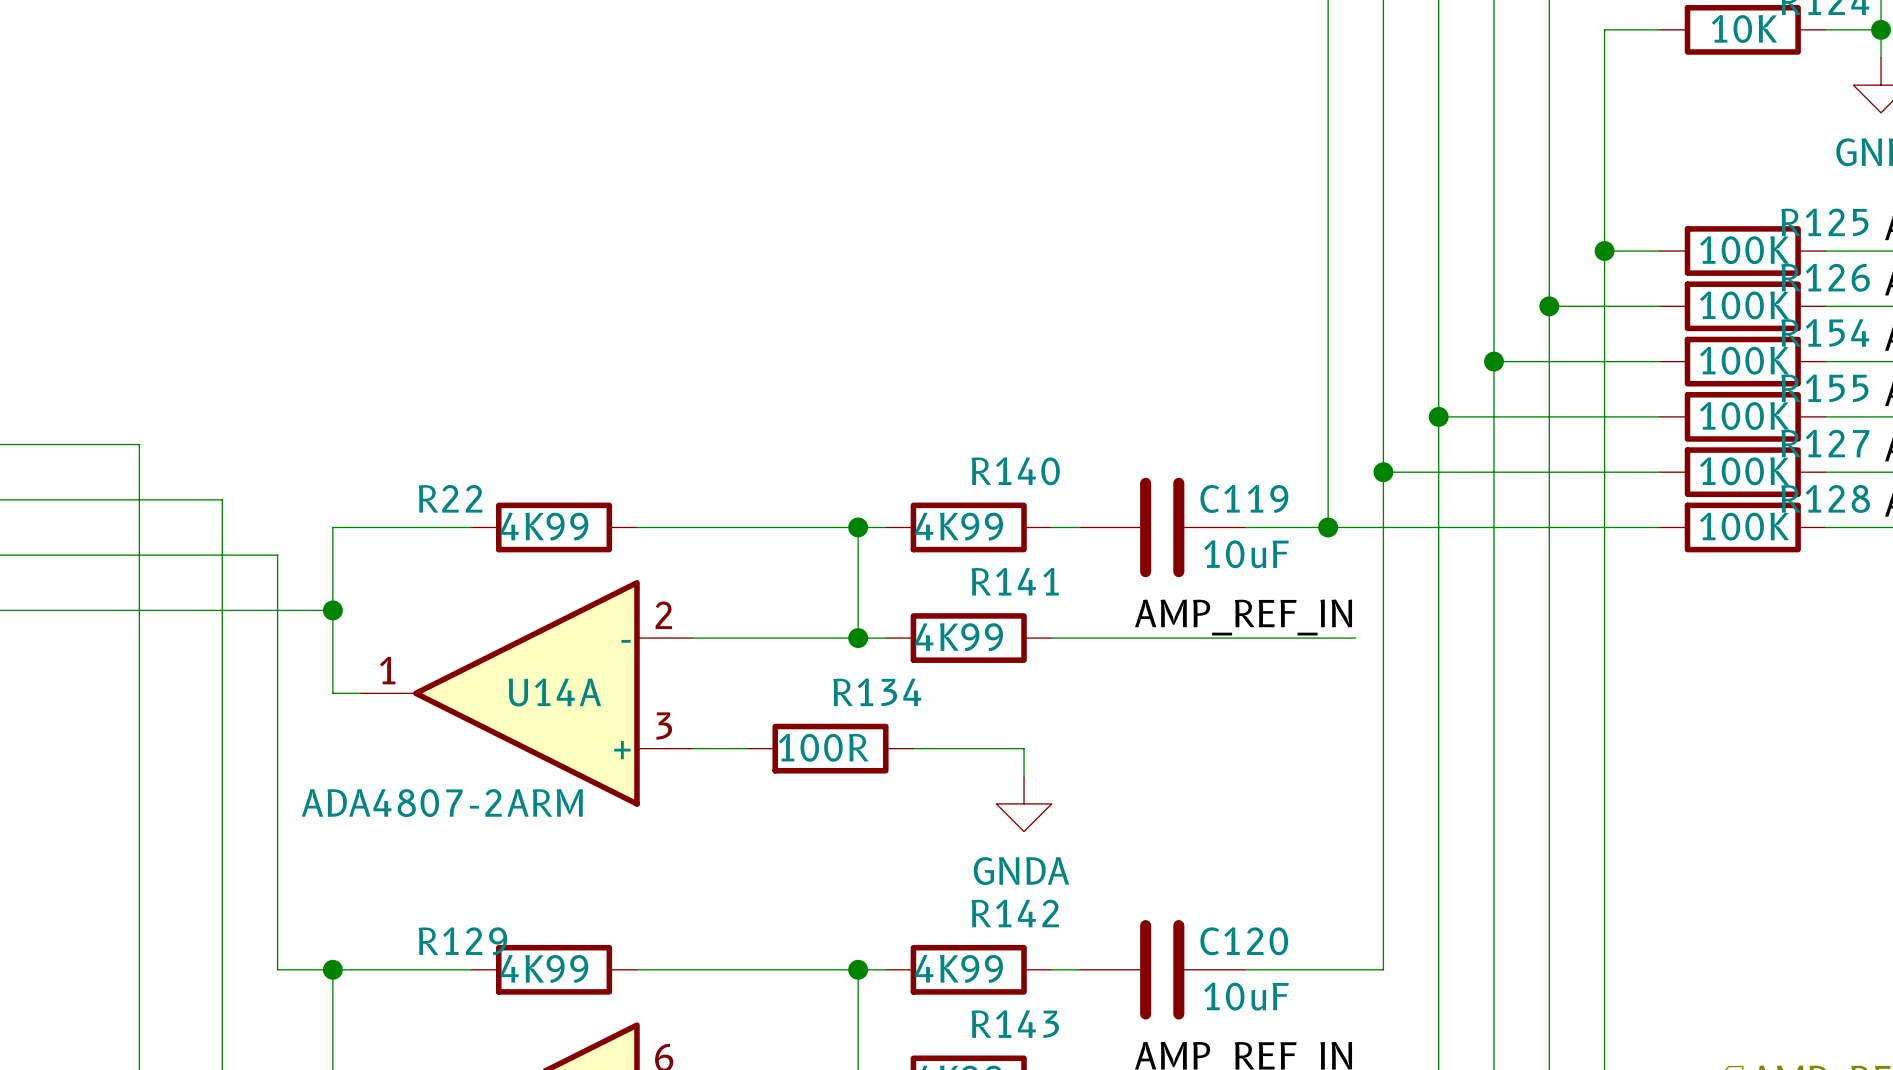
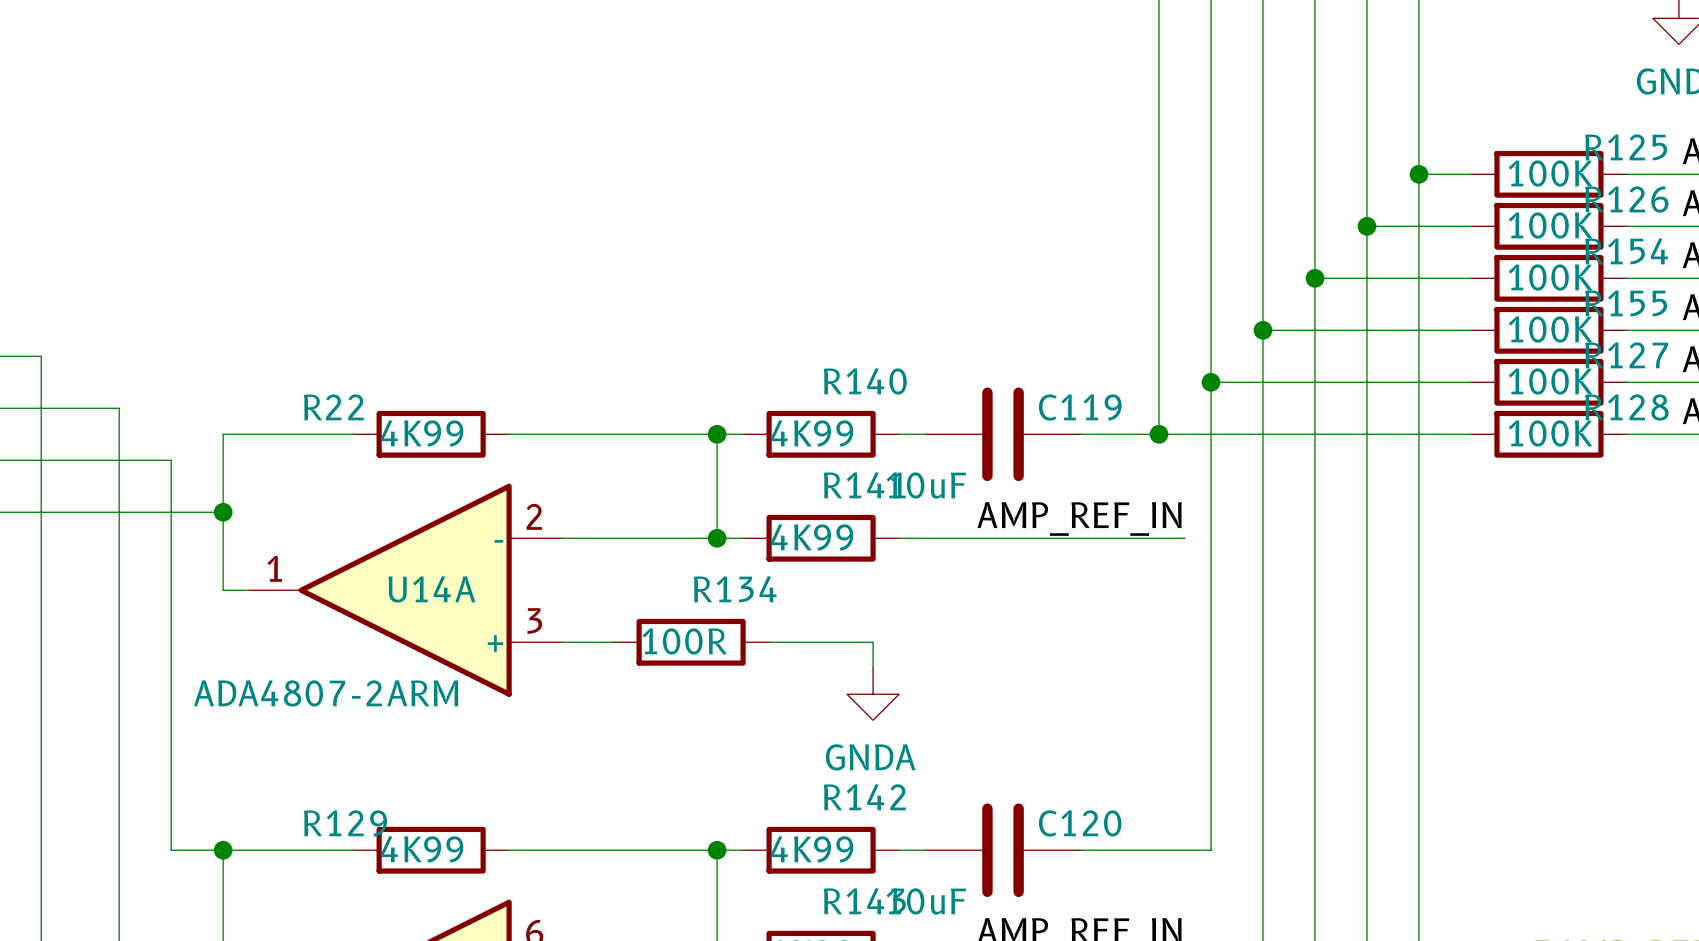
C119 value position: 10uF (1246, 554) -> 10uF (926, 485)
C120 value position: 10uF (1246, 996) -> 10uF (926, 901)

